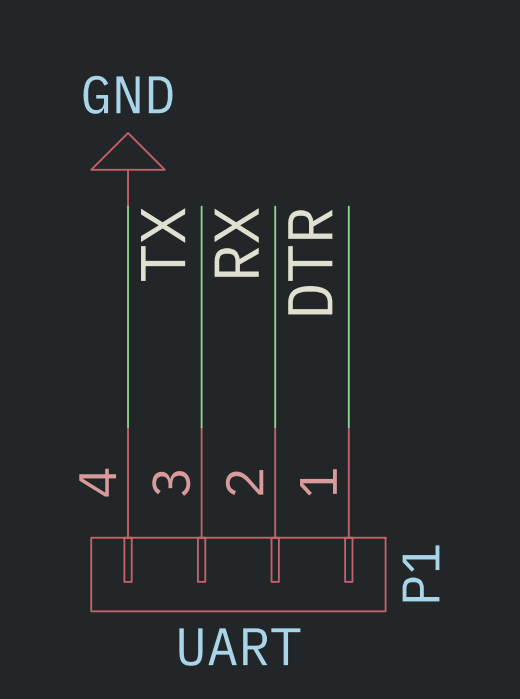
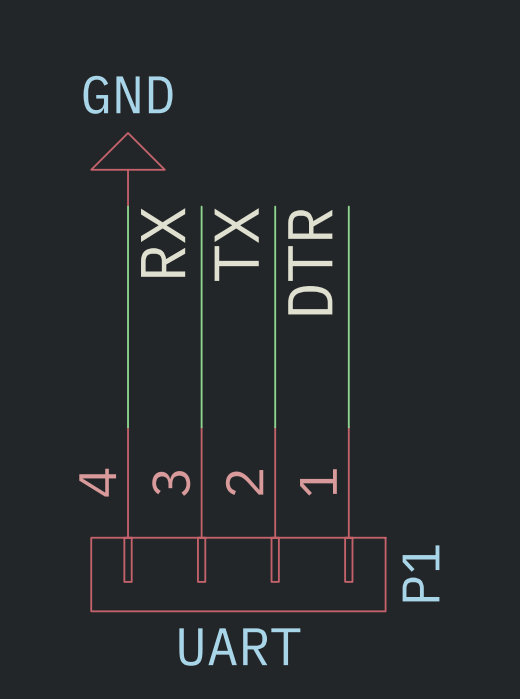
label: RX (236, 242) -> TX (236, 244)
label: TX (163, 244) -> RX (163, 242)

